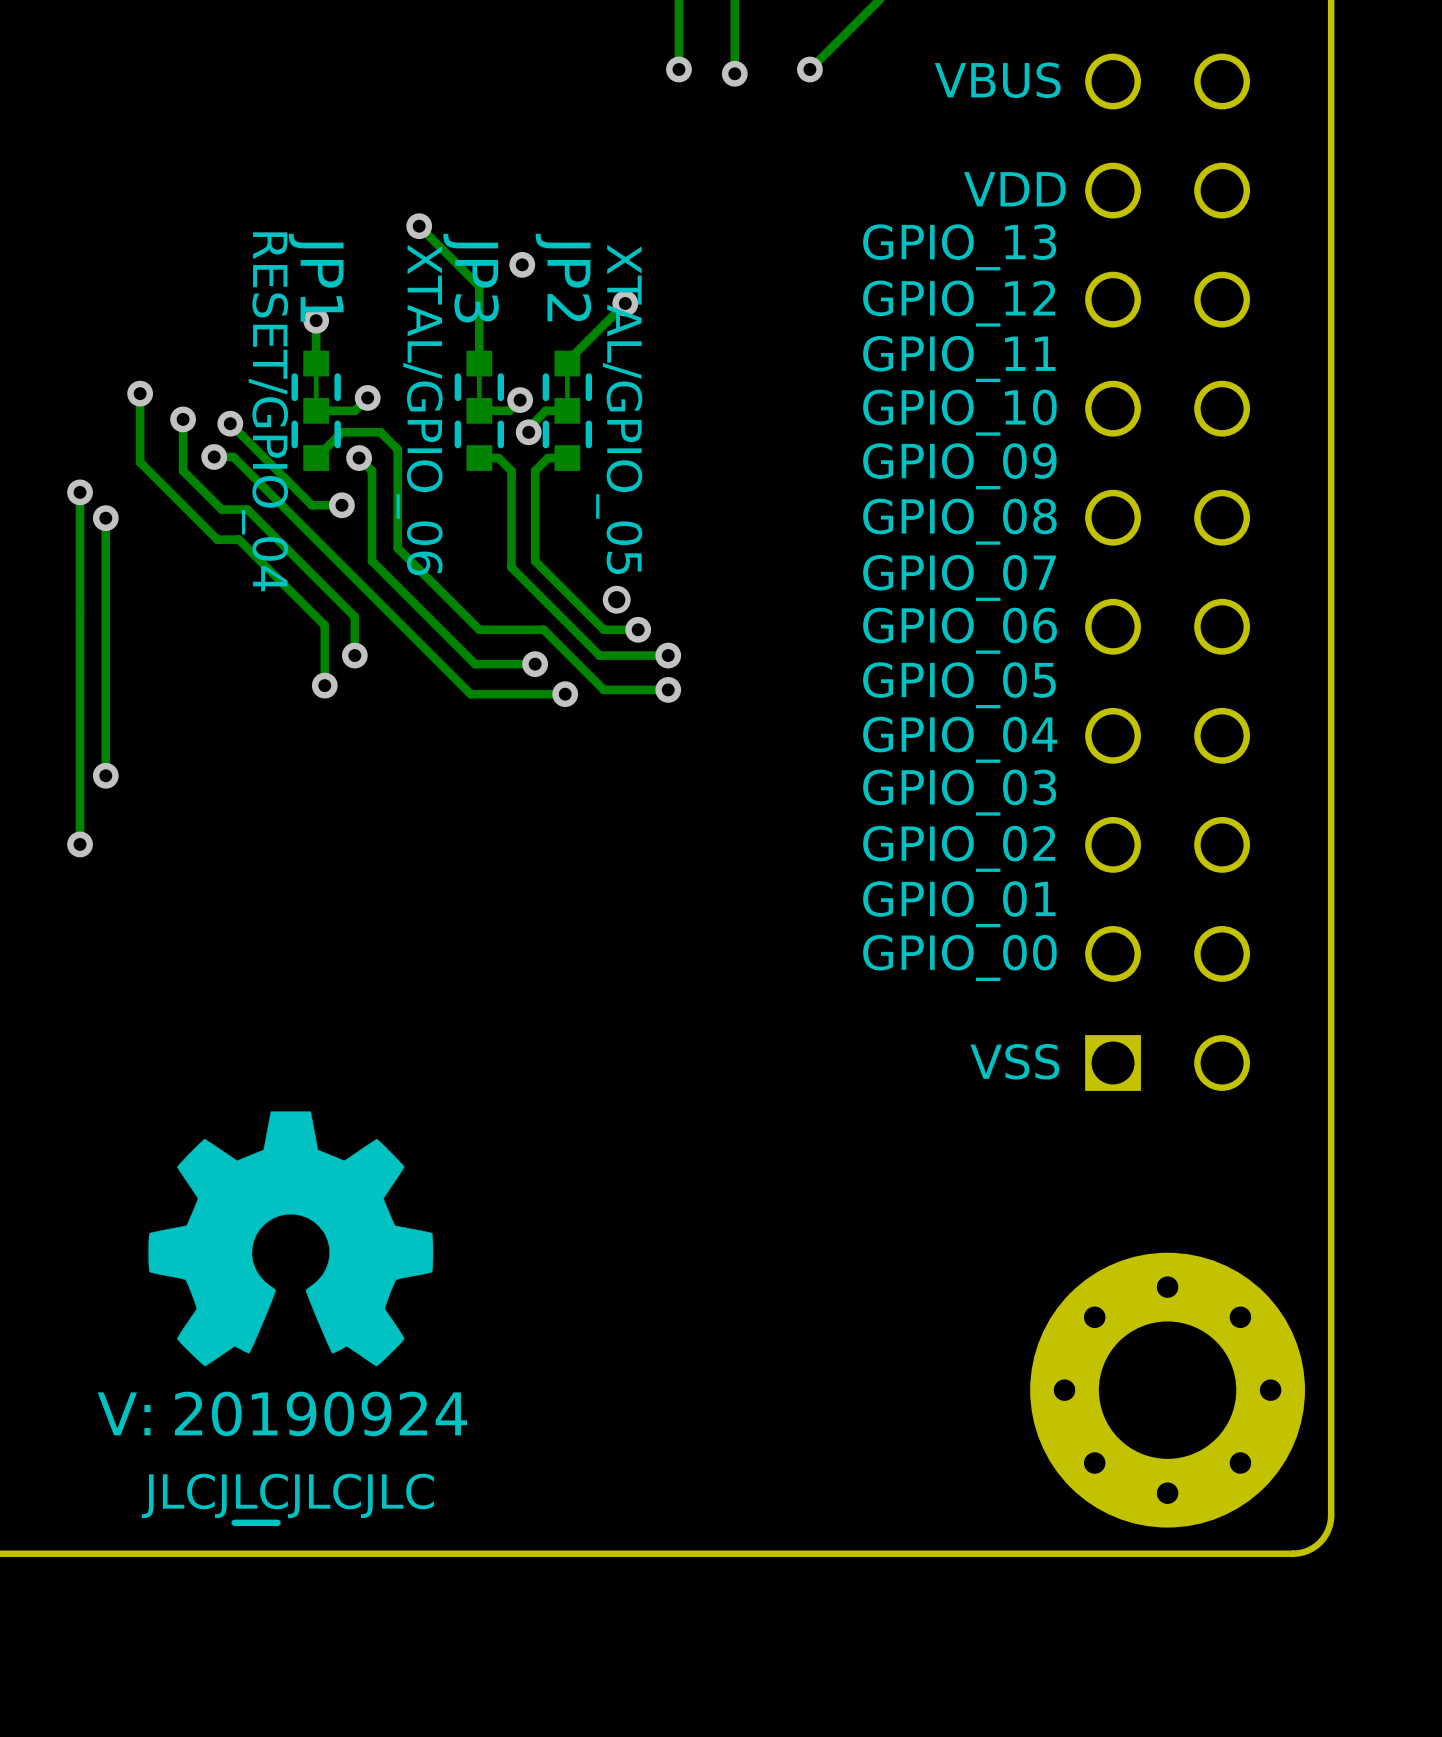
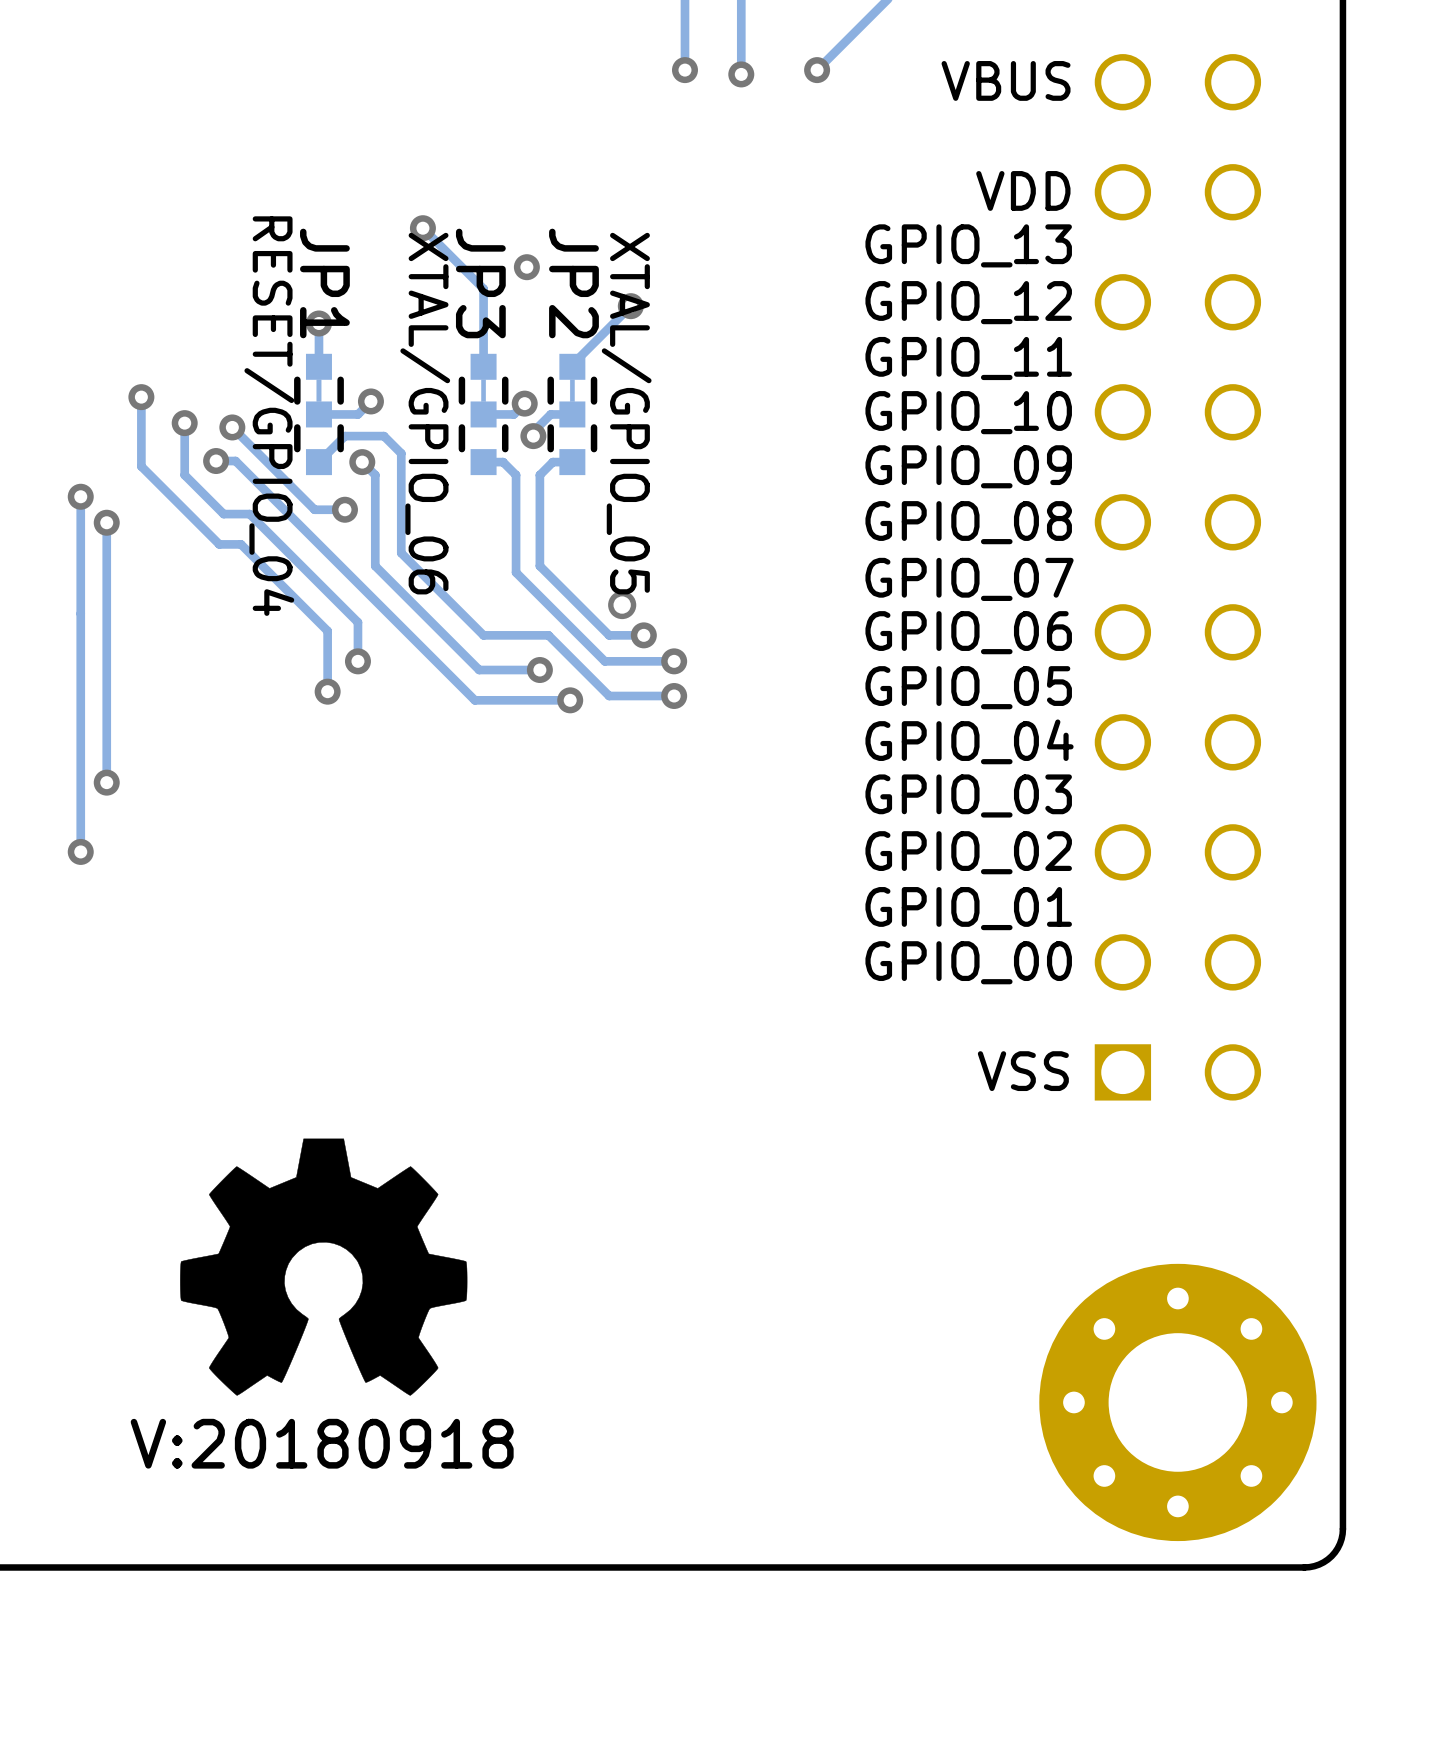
drawing position: (290, 1238) -> (323, 1267)
drawing shape: [97, 1391, 468, 1437] -> [130, 1418, 514, 1469]
drawing: [231, 1519, 281, 1527] -> none

